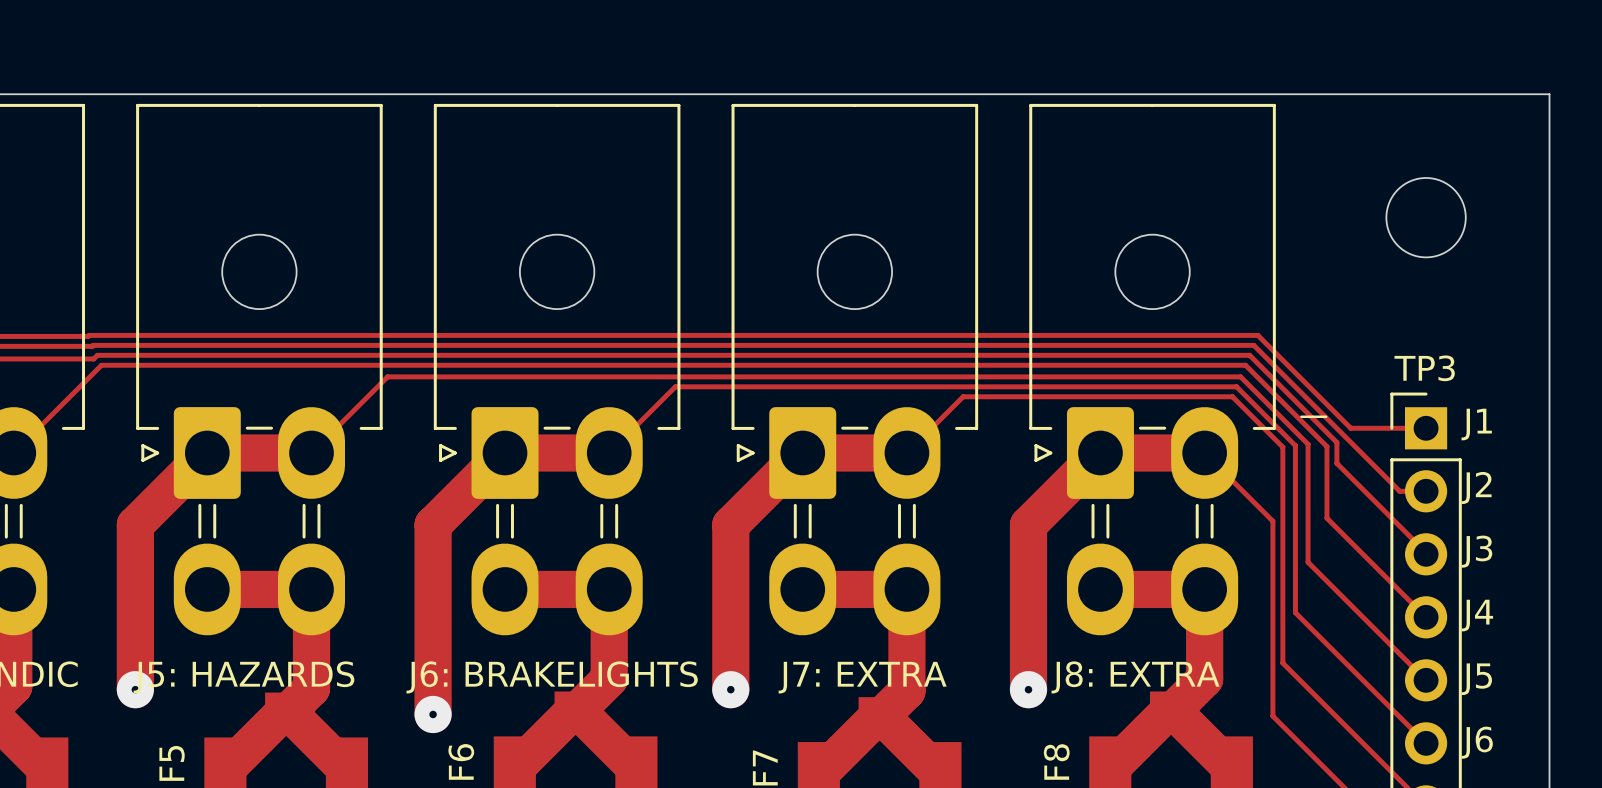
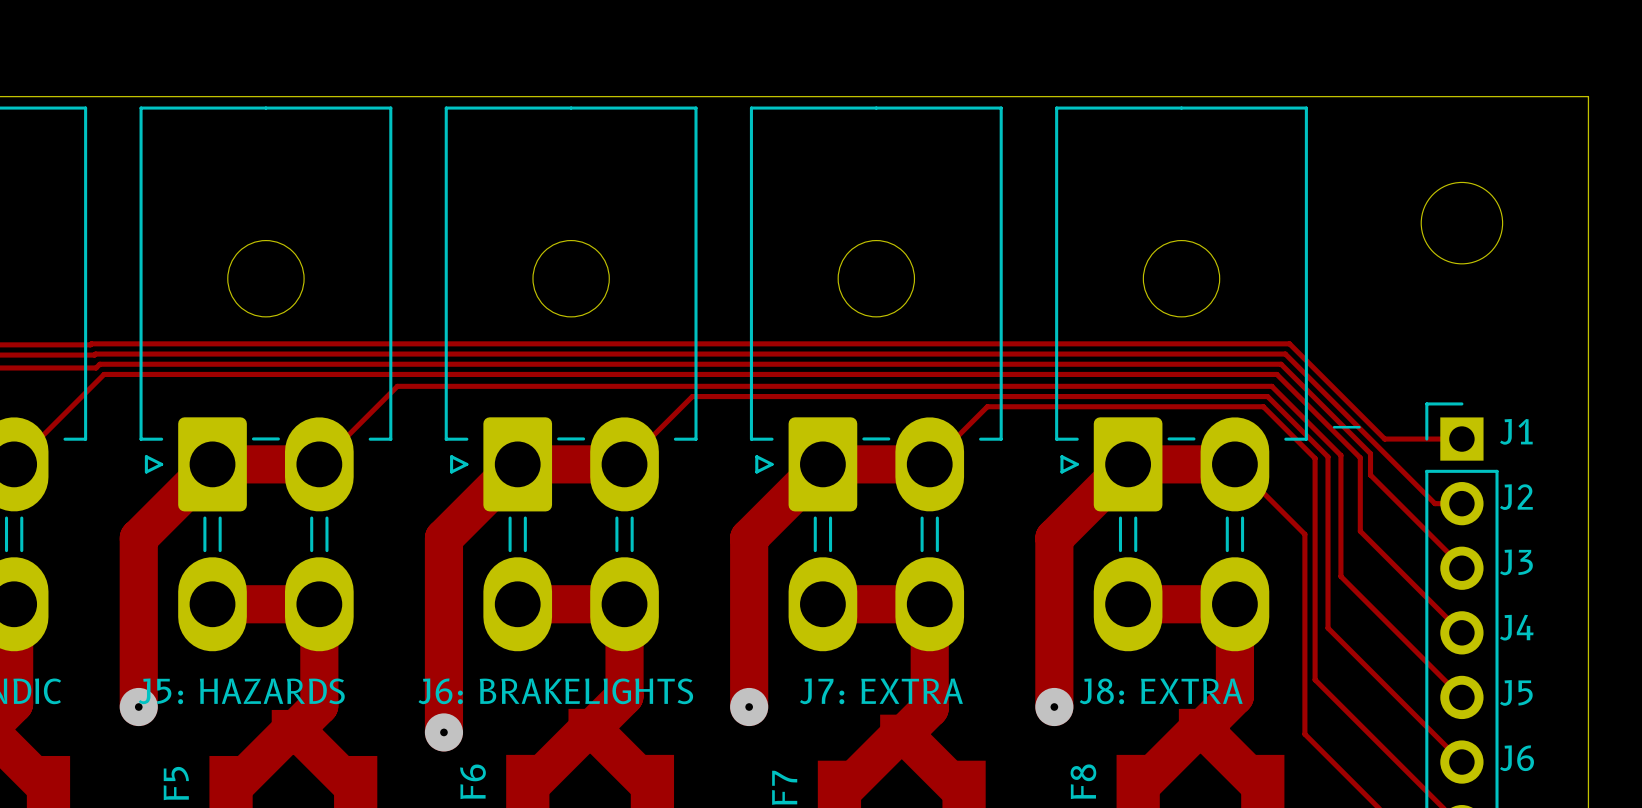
TP3 name: TP3 (1424, 368) -> none

